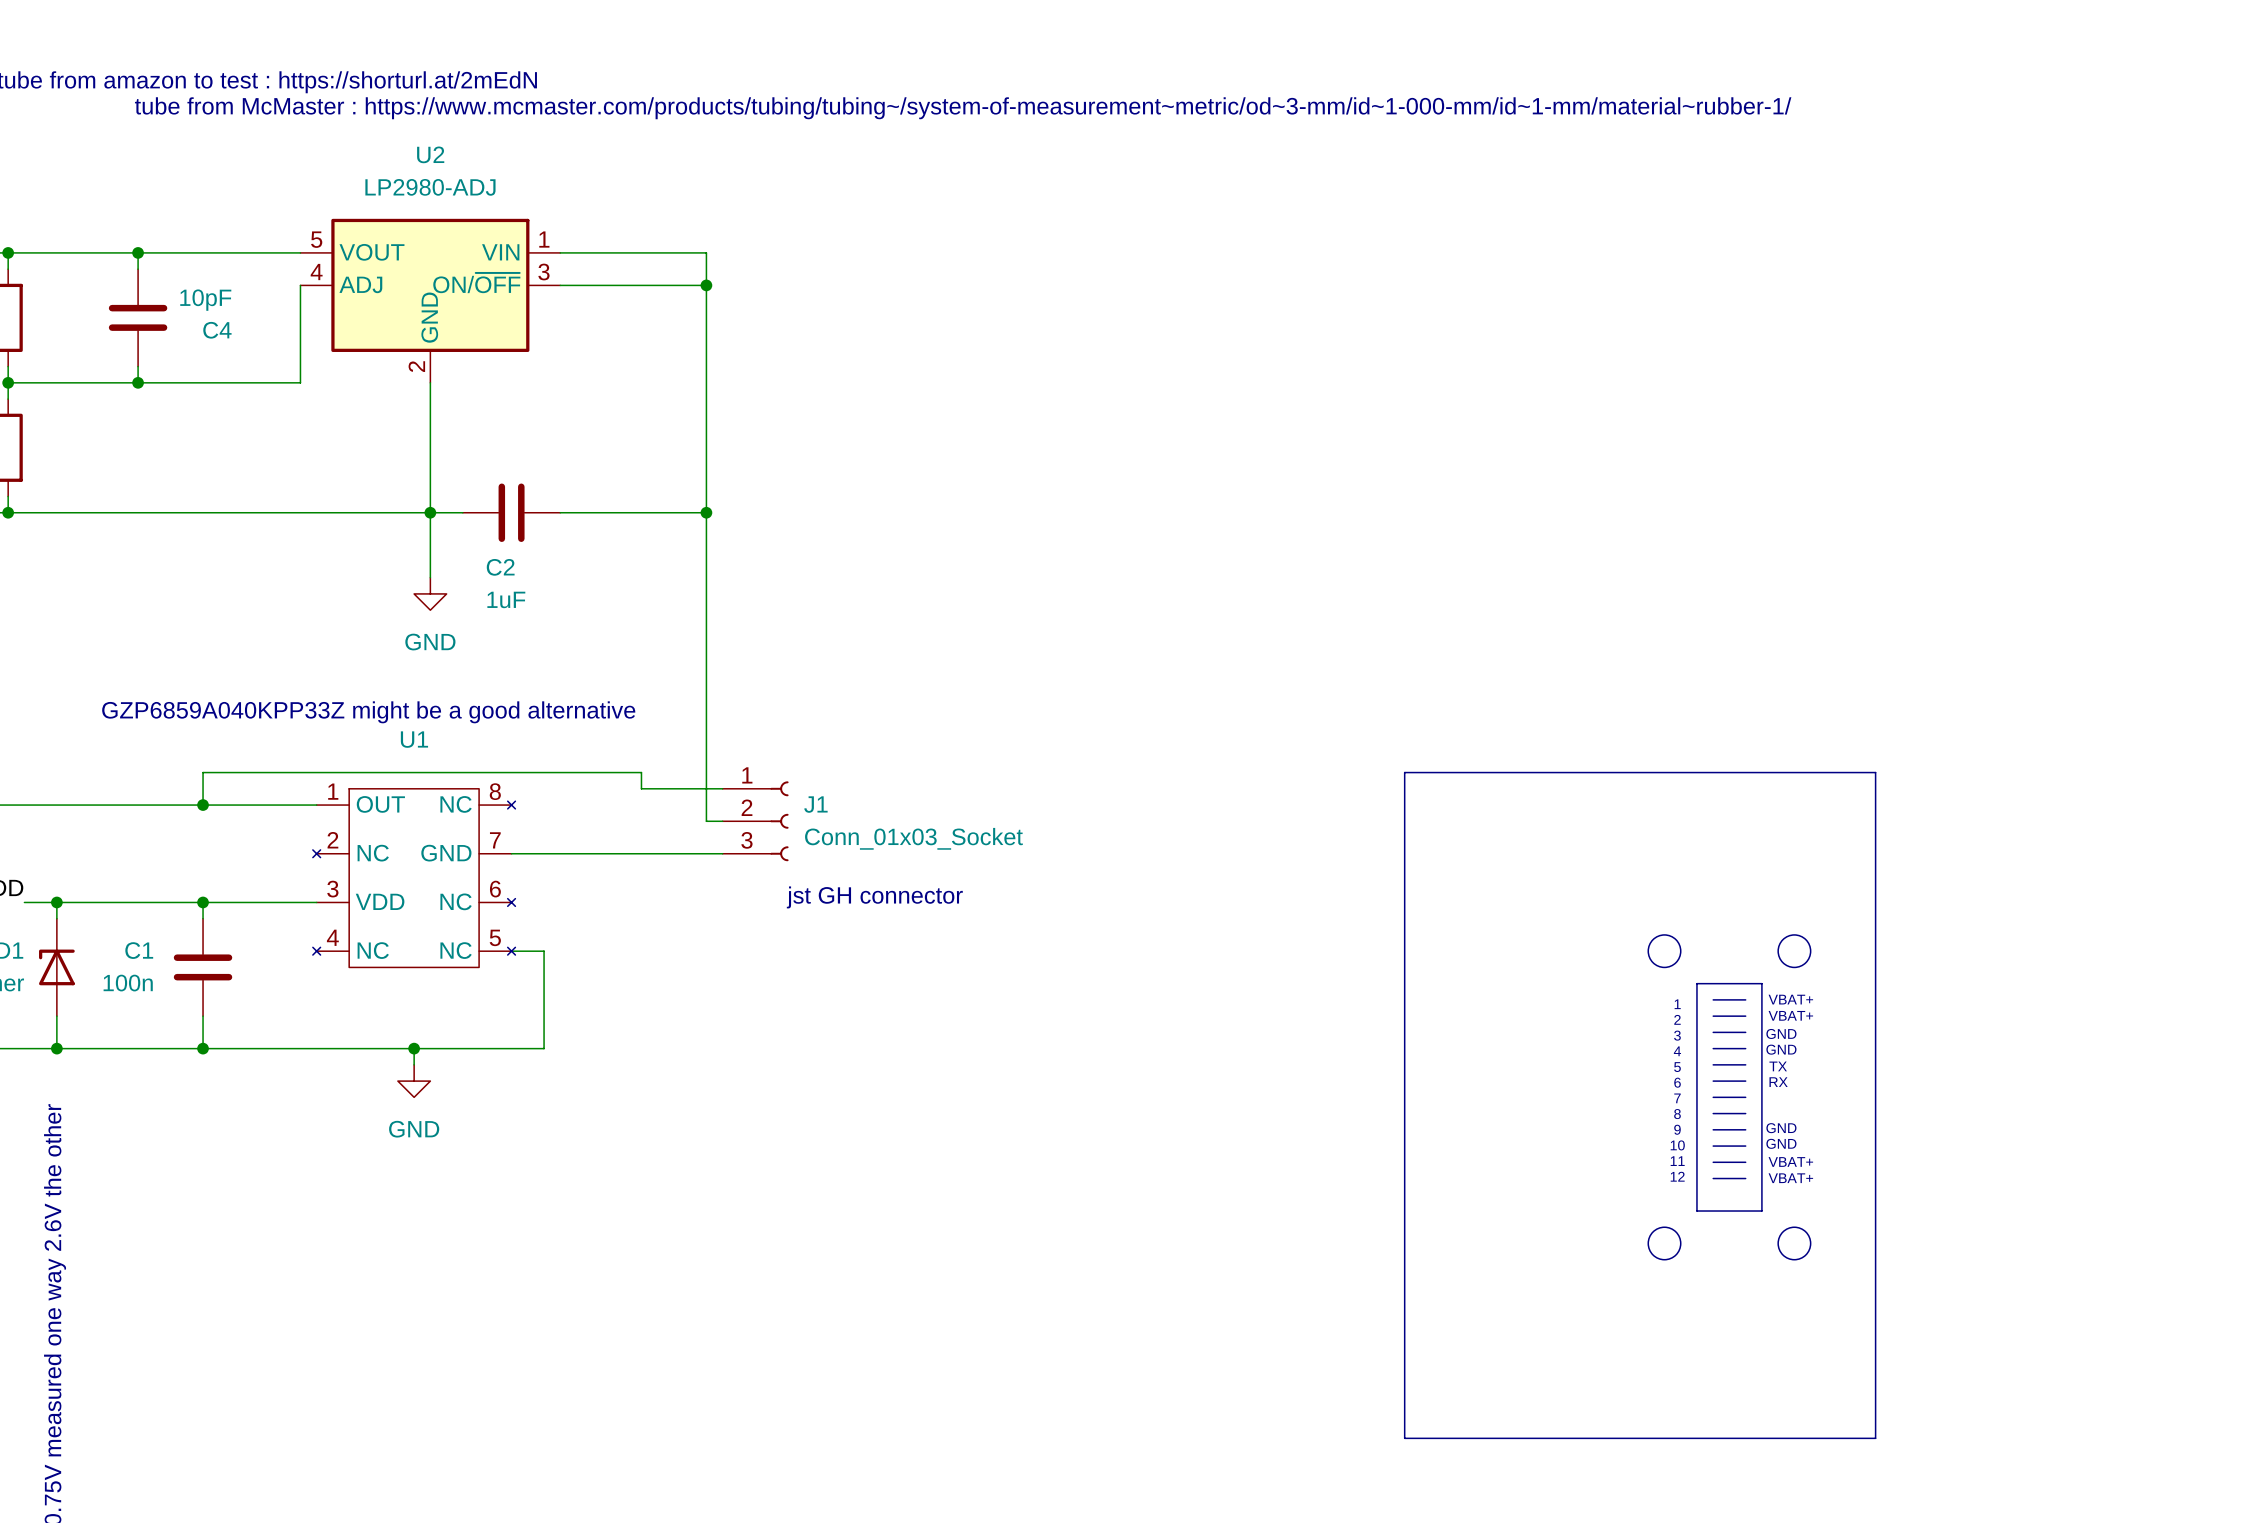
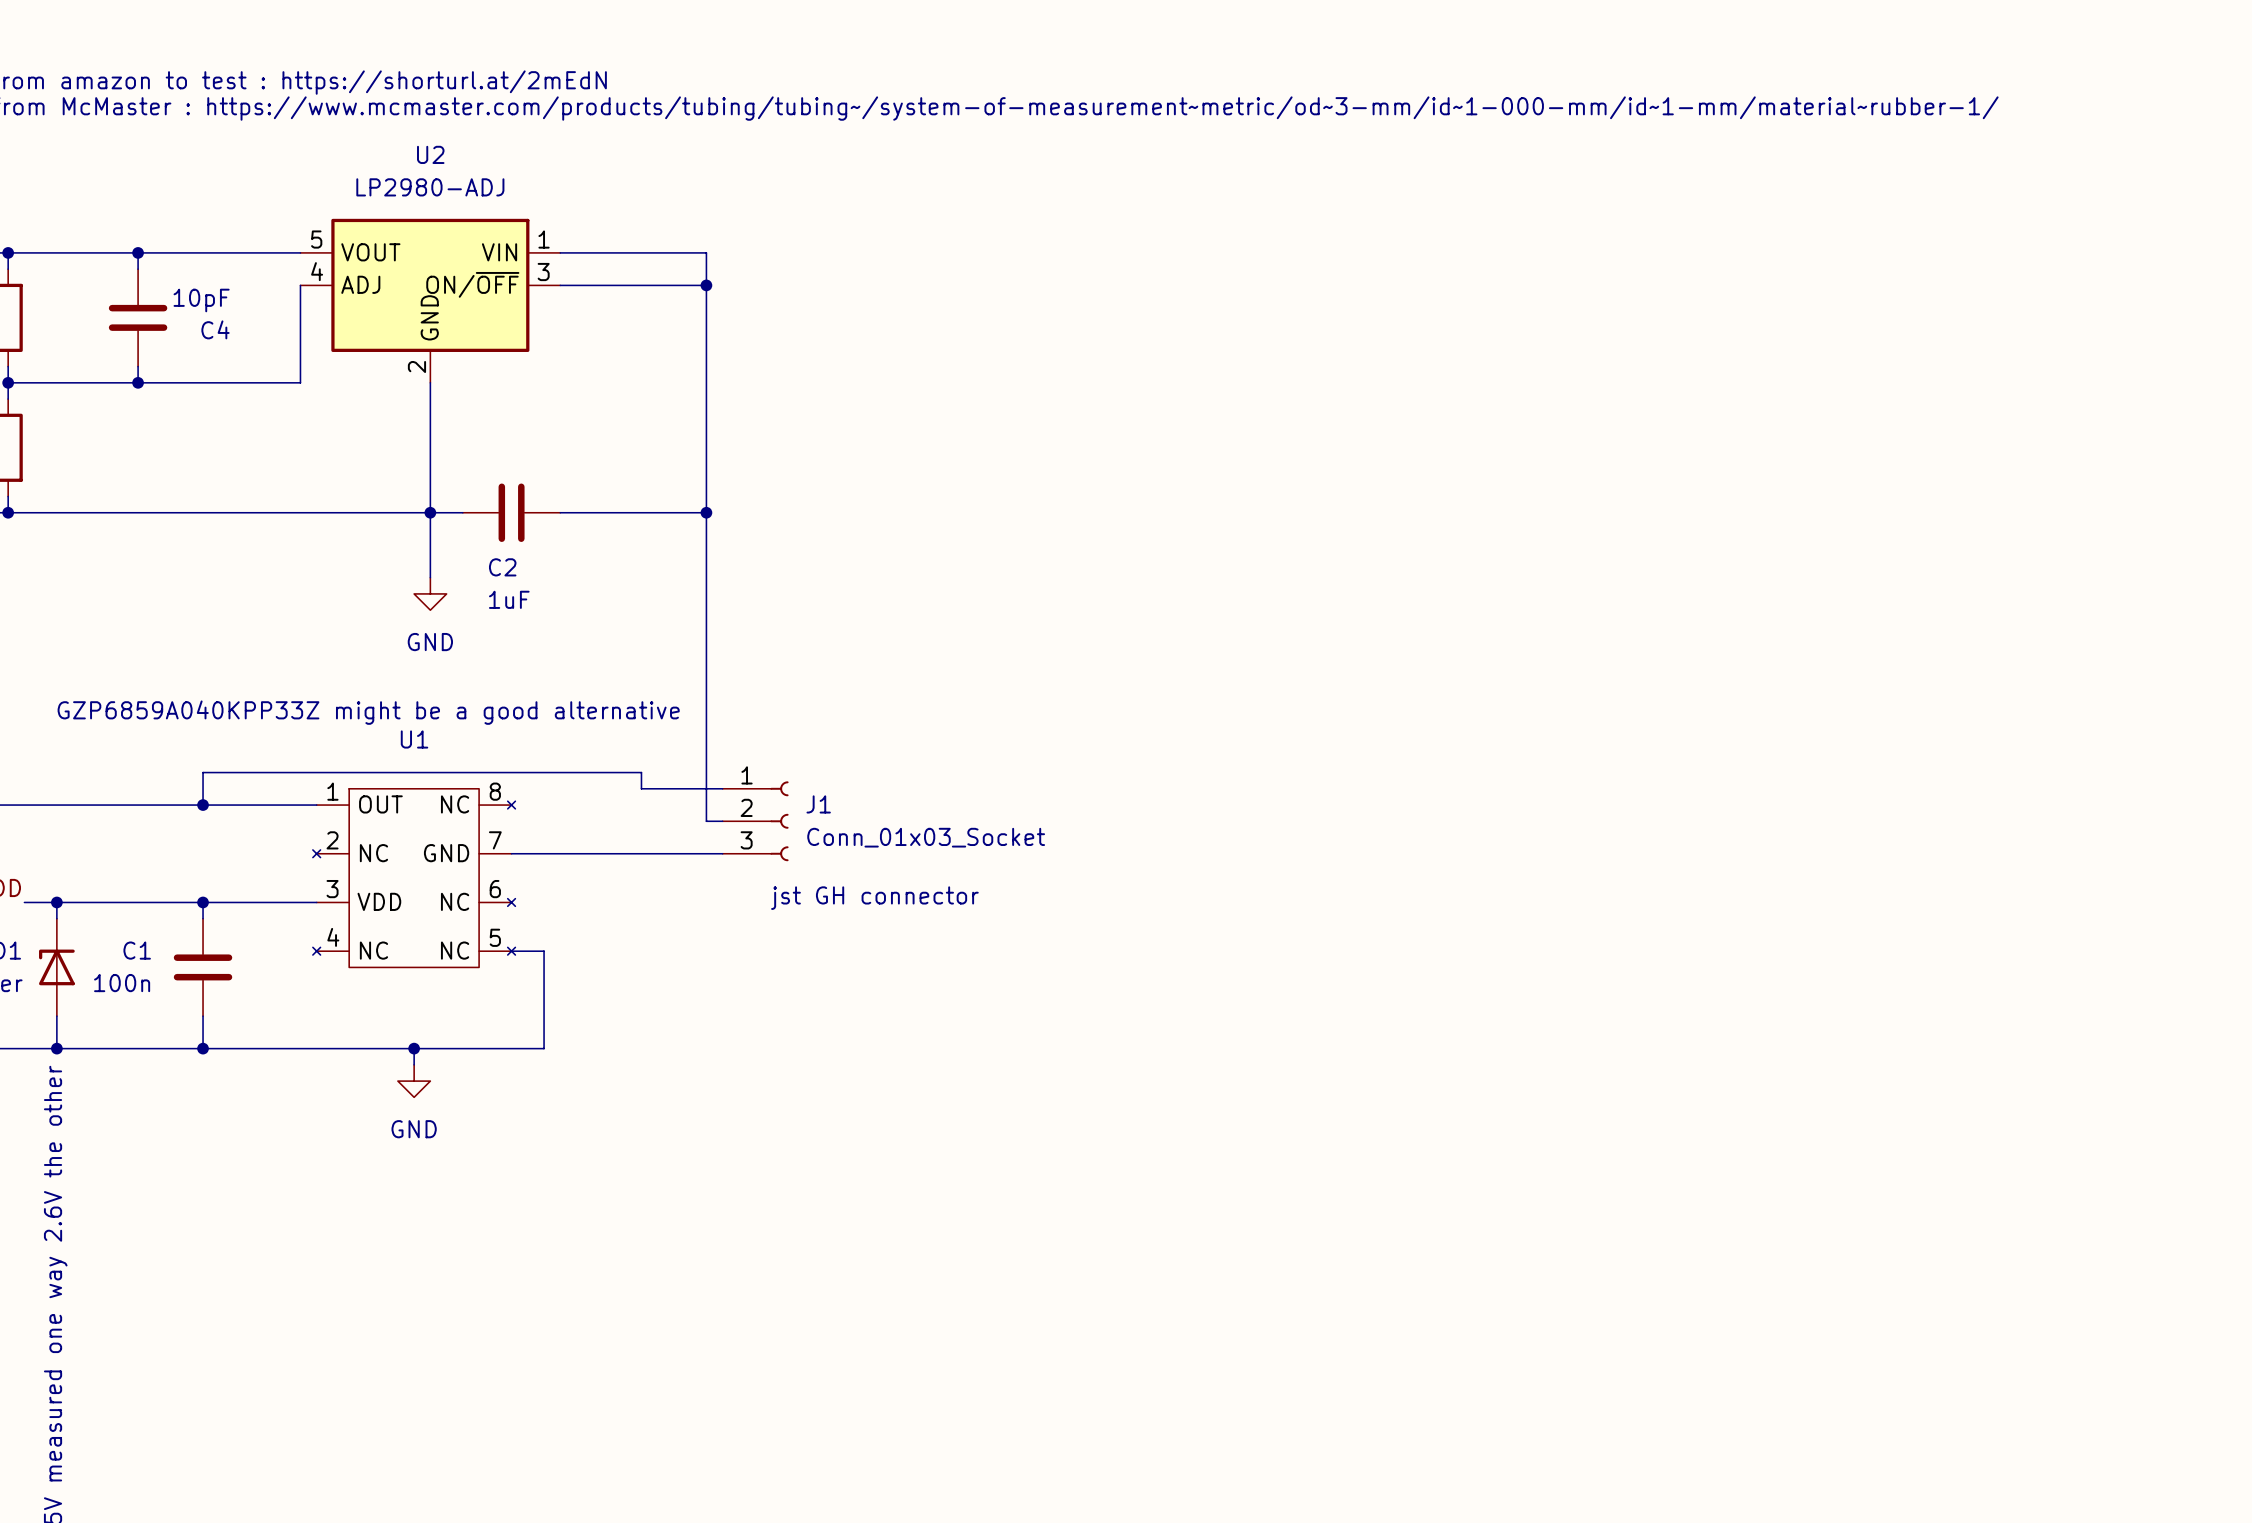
line: (1404, 772) (1875, 772) (1875, 1438) (1404, 1438) (1404, 772) -> none
drawing: [1648, 934, 1681, 968] -> none
drawing: [1778, 934, 1811, 968] -> none
line: (1696, 983) (1761, 983) (1761, 1211) (1696, 1211) (1696, 983) -> none
bus: (1713, 999) (1745, 999) -> none
text: VBAT+ (1790, 999) -> none
text: 1 (1677, 1004) -> none
text: VBAT+ (1790, 1015) -> none
bus: (1713, 1016) (1745, 1016) -> none
text: 2 (1677, 1019) -> none
bus: (1713, 1032) (1745, 1032) -> none
text: GND (1781, 1033) -> none
text: 3 (1677, 1035) -> none
bus: (1713, 1048) (1745, 1048) -> none
text: GND (1781, 1049) -> none
text: 4 (1677, 1051) -> none
bus: (1713, 1064) (1745, 1064) -> none
text: TX (1778, 1066) -> none
text: 5 (1677, 1067) -> none
bus: (1713, 1081) (1745, 1081) -> none
text: 6 (1677, 1082) -> none
text: RX (1778, 1082) -> none
bus: (1713, 1097) (1745, 1097) -> none
text: 7 (1677, 1098) -> none
bus: (1713, 1113) (1745, 1113) -> none
text: 8 (1677, 1114) -> none
text: GND (1781, 1128) -> none
text: 9 (1677, 1129) -> none
bus: (1713, 1129) (1745, 1129) -> none
text: GND (1781, 1143) -> none
text: 10 (1677, 1145) -> none
bus: (1713, 1146) (1745, 1146) -> none
text: 11 (1677, 1161) -> none
text: VBAT+ (1790, 1161) -> none
bus: (1713, 1162) (1745, 1162) -> none
text: 12 (1677, 1176) -> none
bus: (1713, 1178) (1745, 1178) -> none
text: VBAT+ (1790, 1178) -> none
drawing: [1648, 1227, 1681, 1260] -> none
drawing: [1778, 1227, 1811, 1260] -> none

